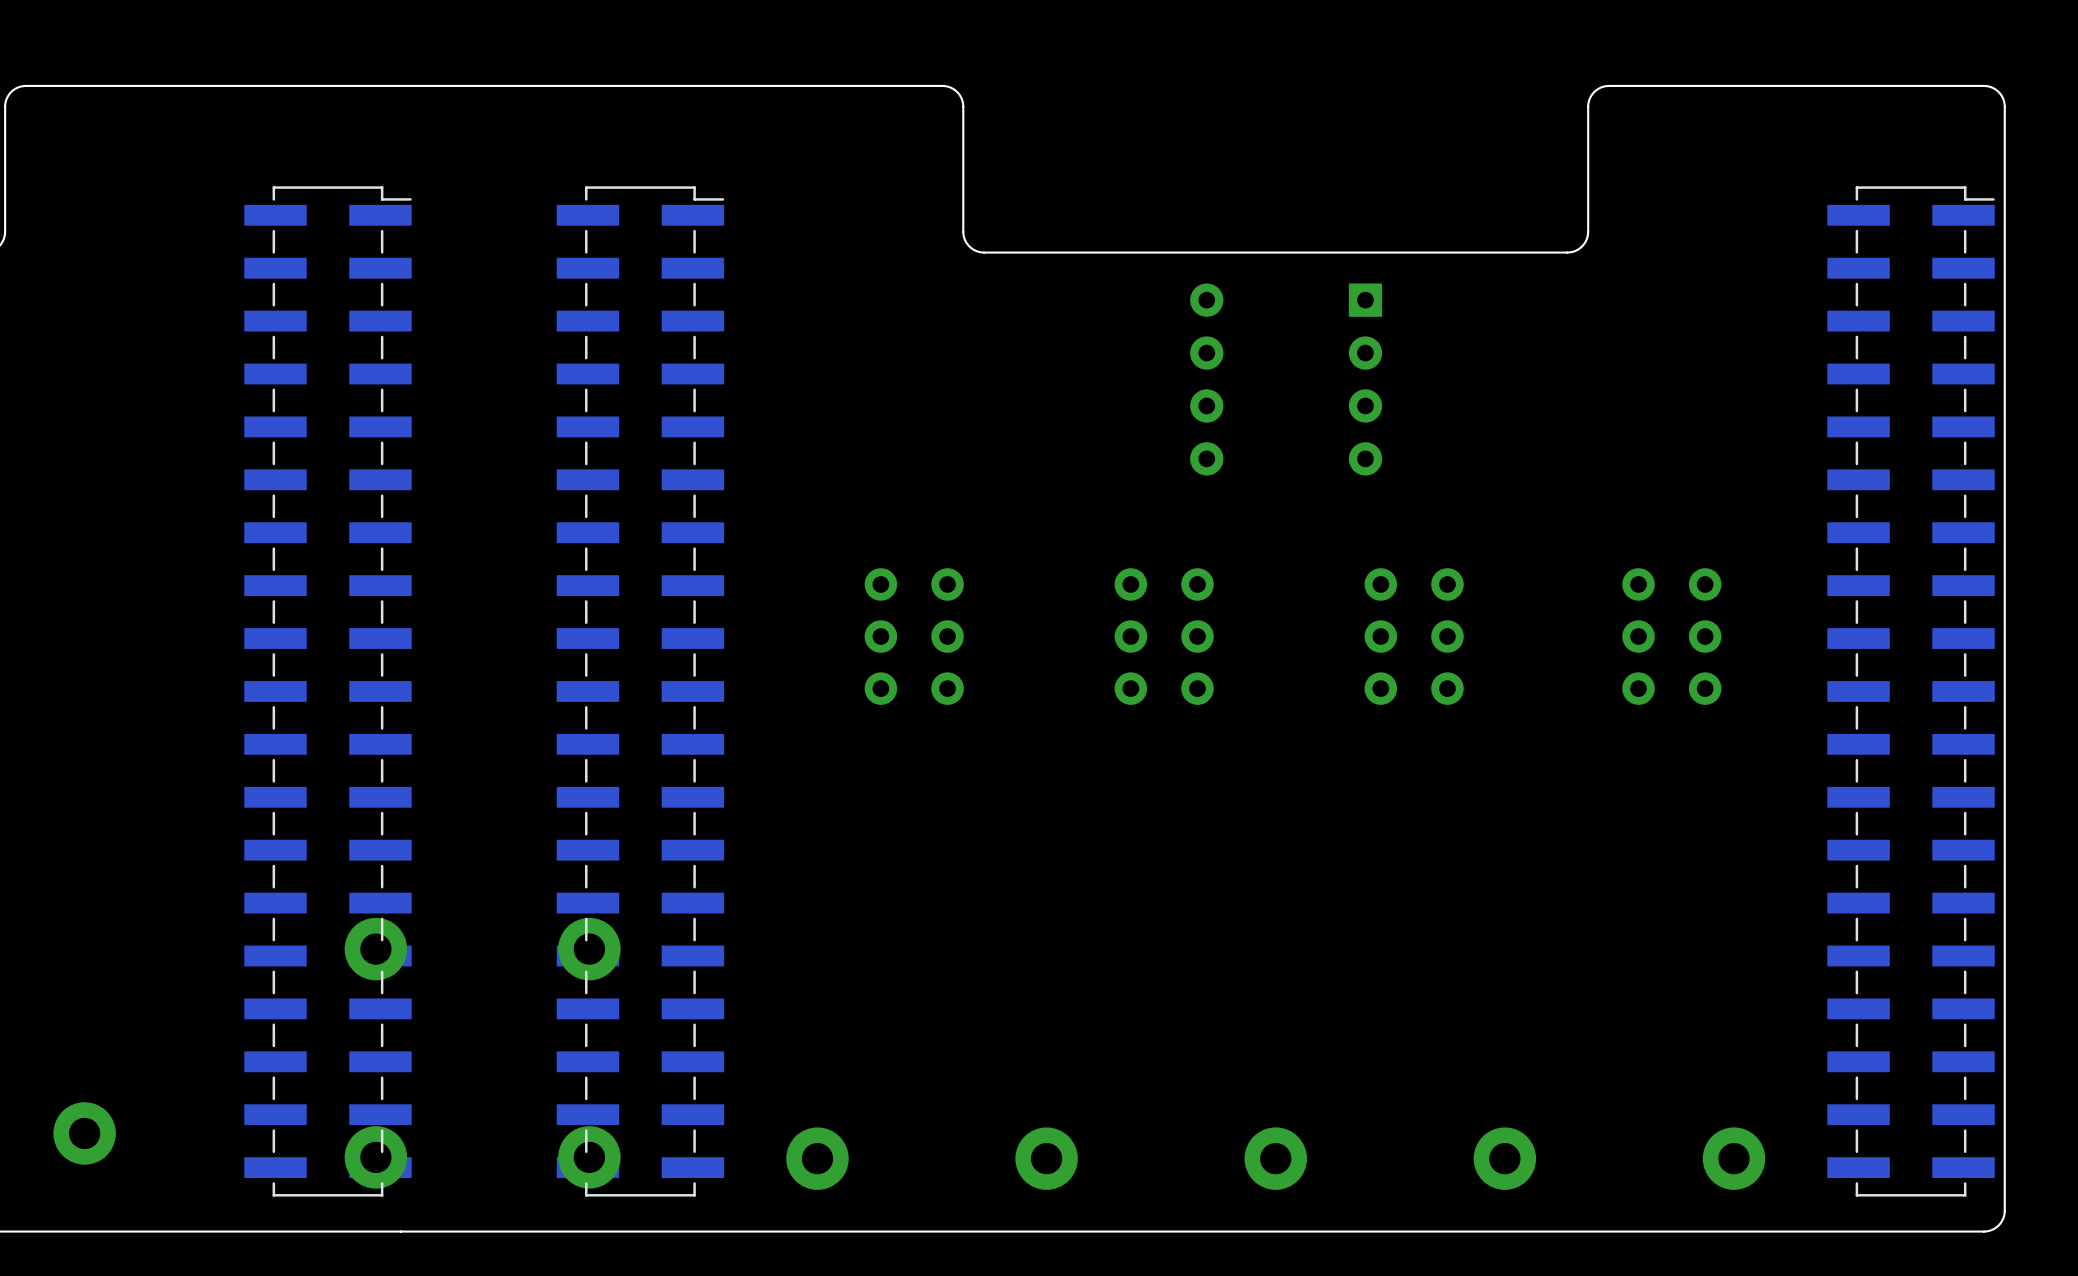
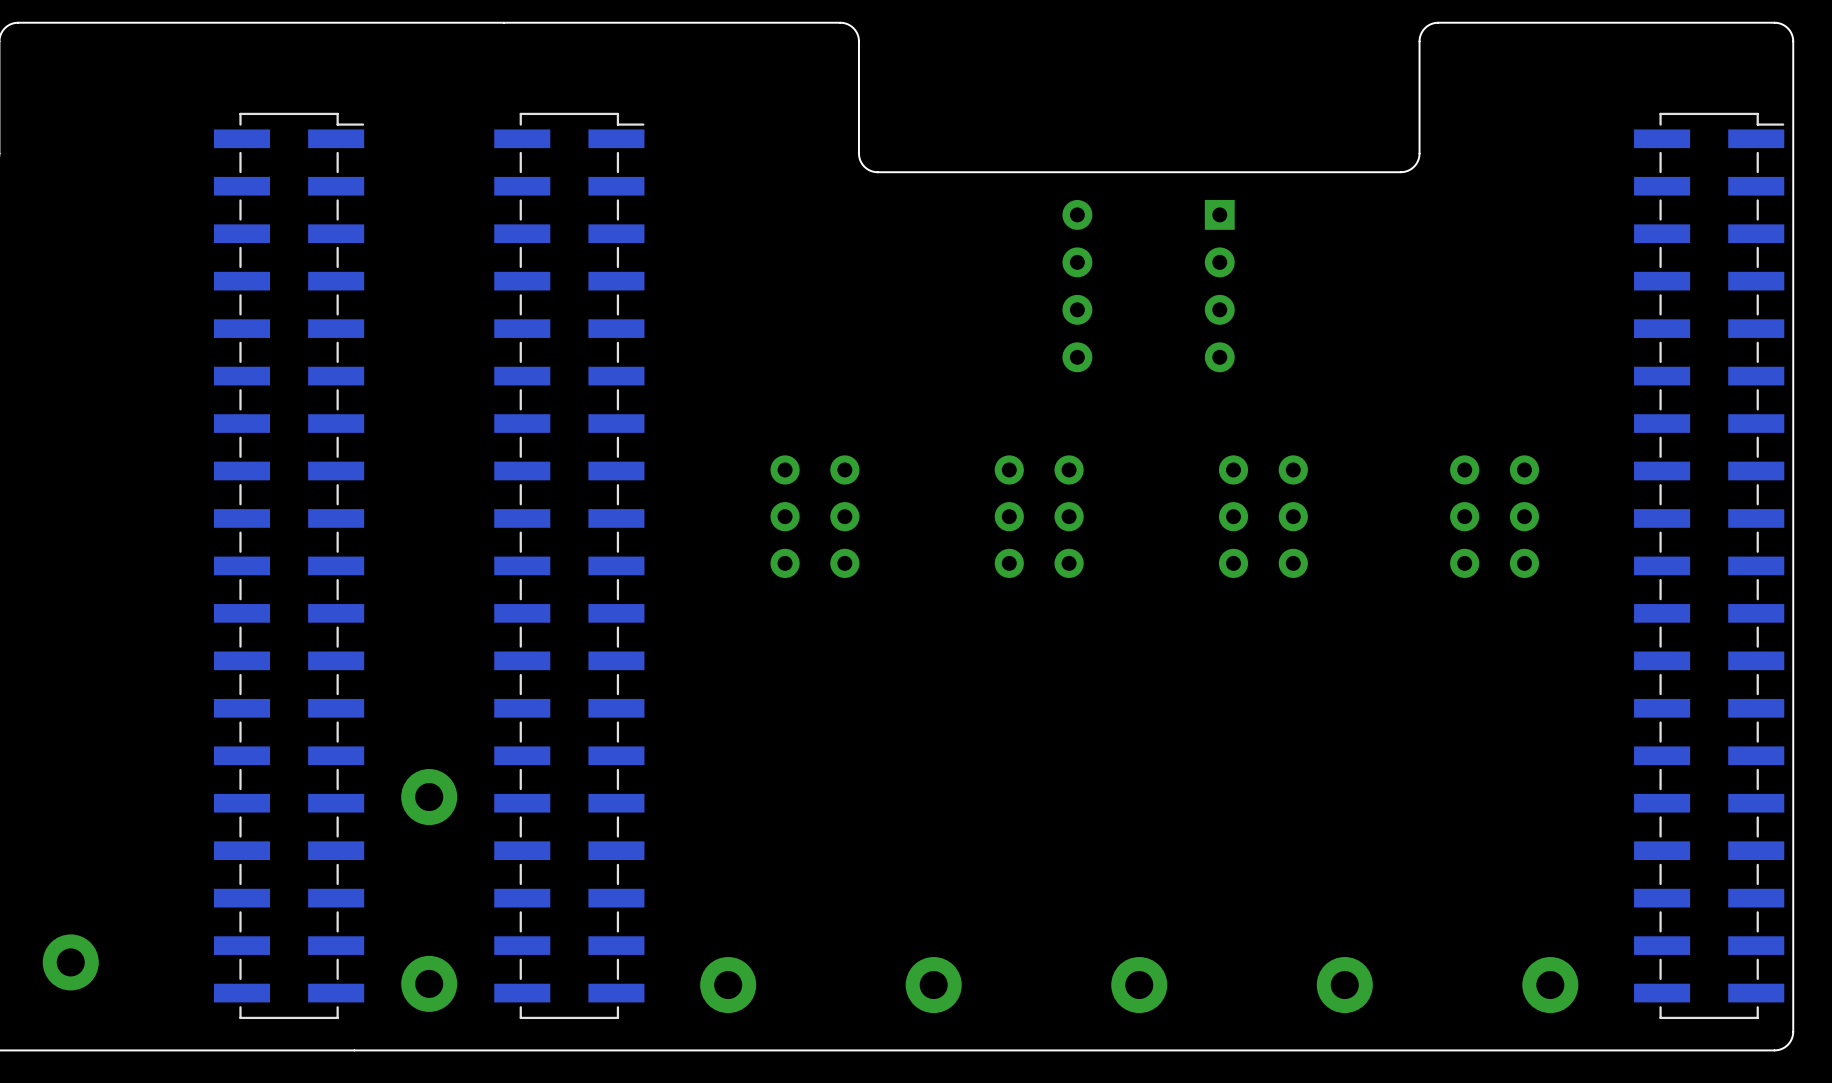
part: (375, 949) -> none
part: none -> (429, 797)
part: (589, 949) -> none
part: (375, 1157) -> none
part: none -> (429, 983)
part: (589, 1157) -> none

